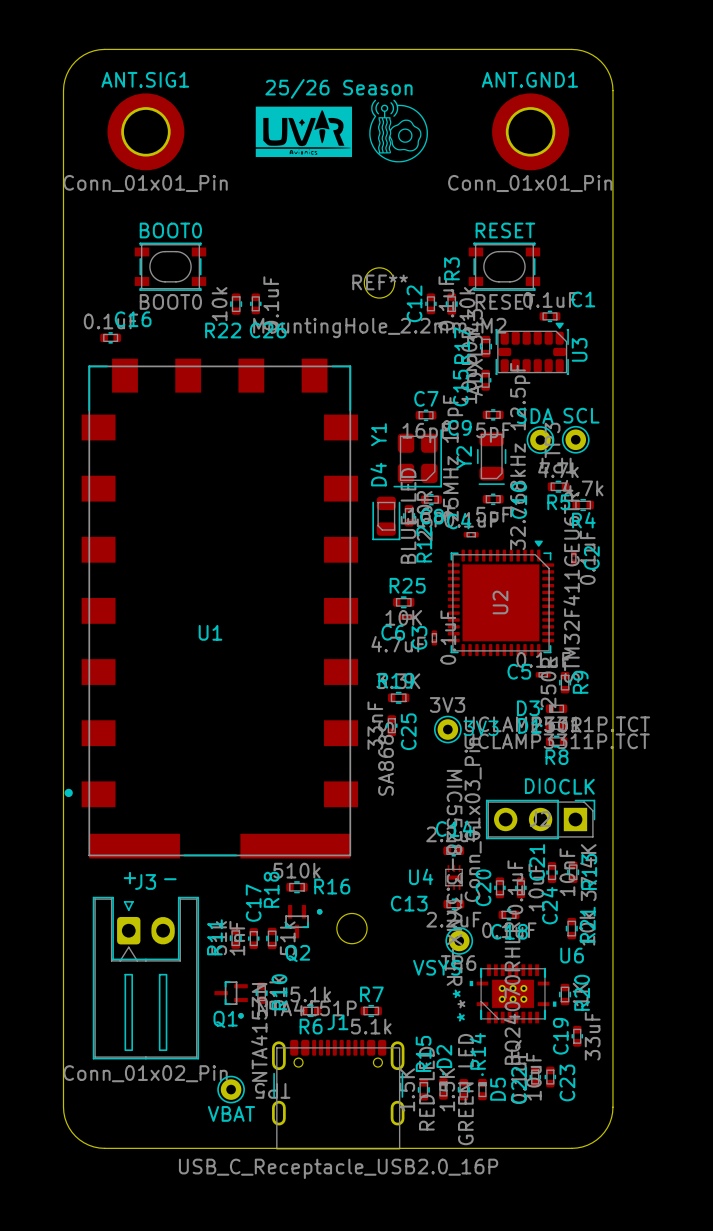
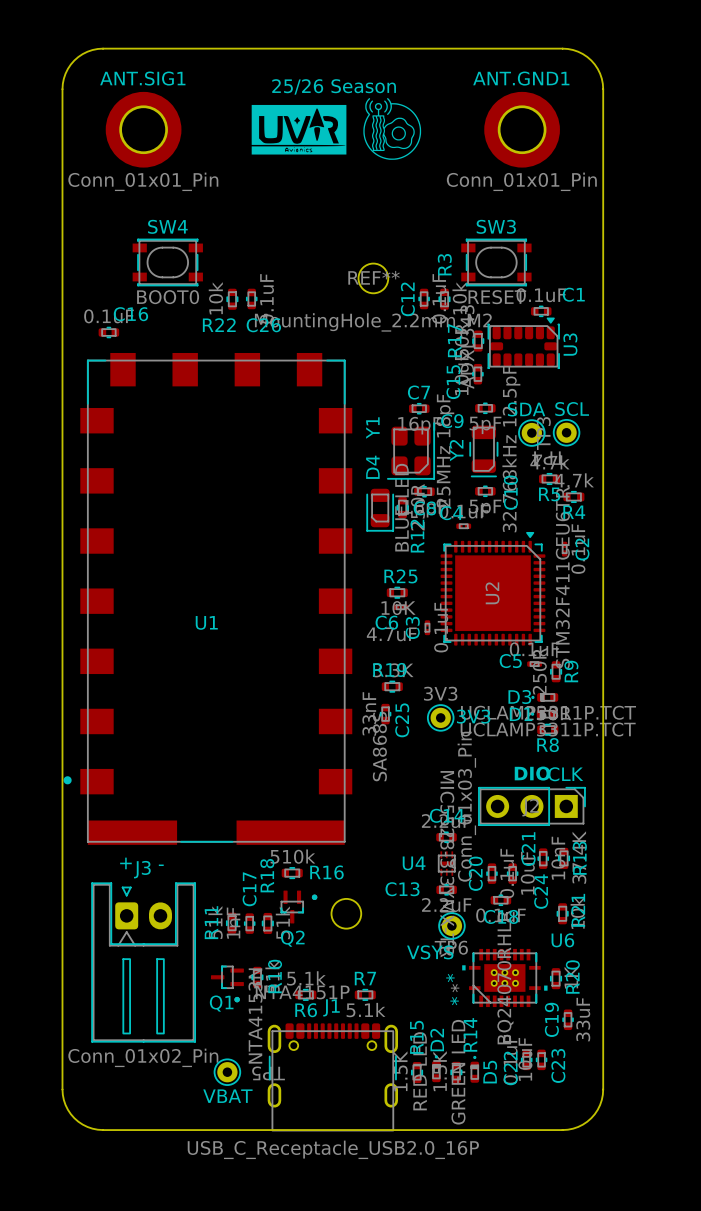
BOOT0 name: BOOT0 (170, 230) -> SW4 (167, 226)
RESET name: RESET (505, 230) -> SW3 (496, 226)

